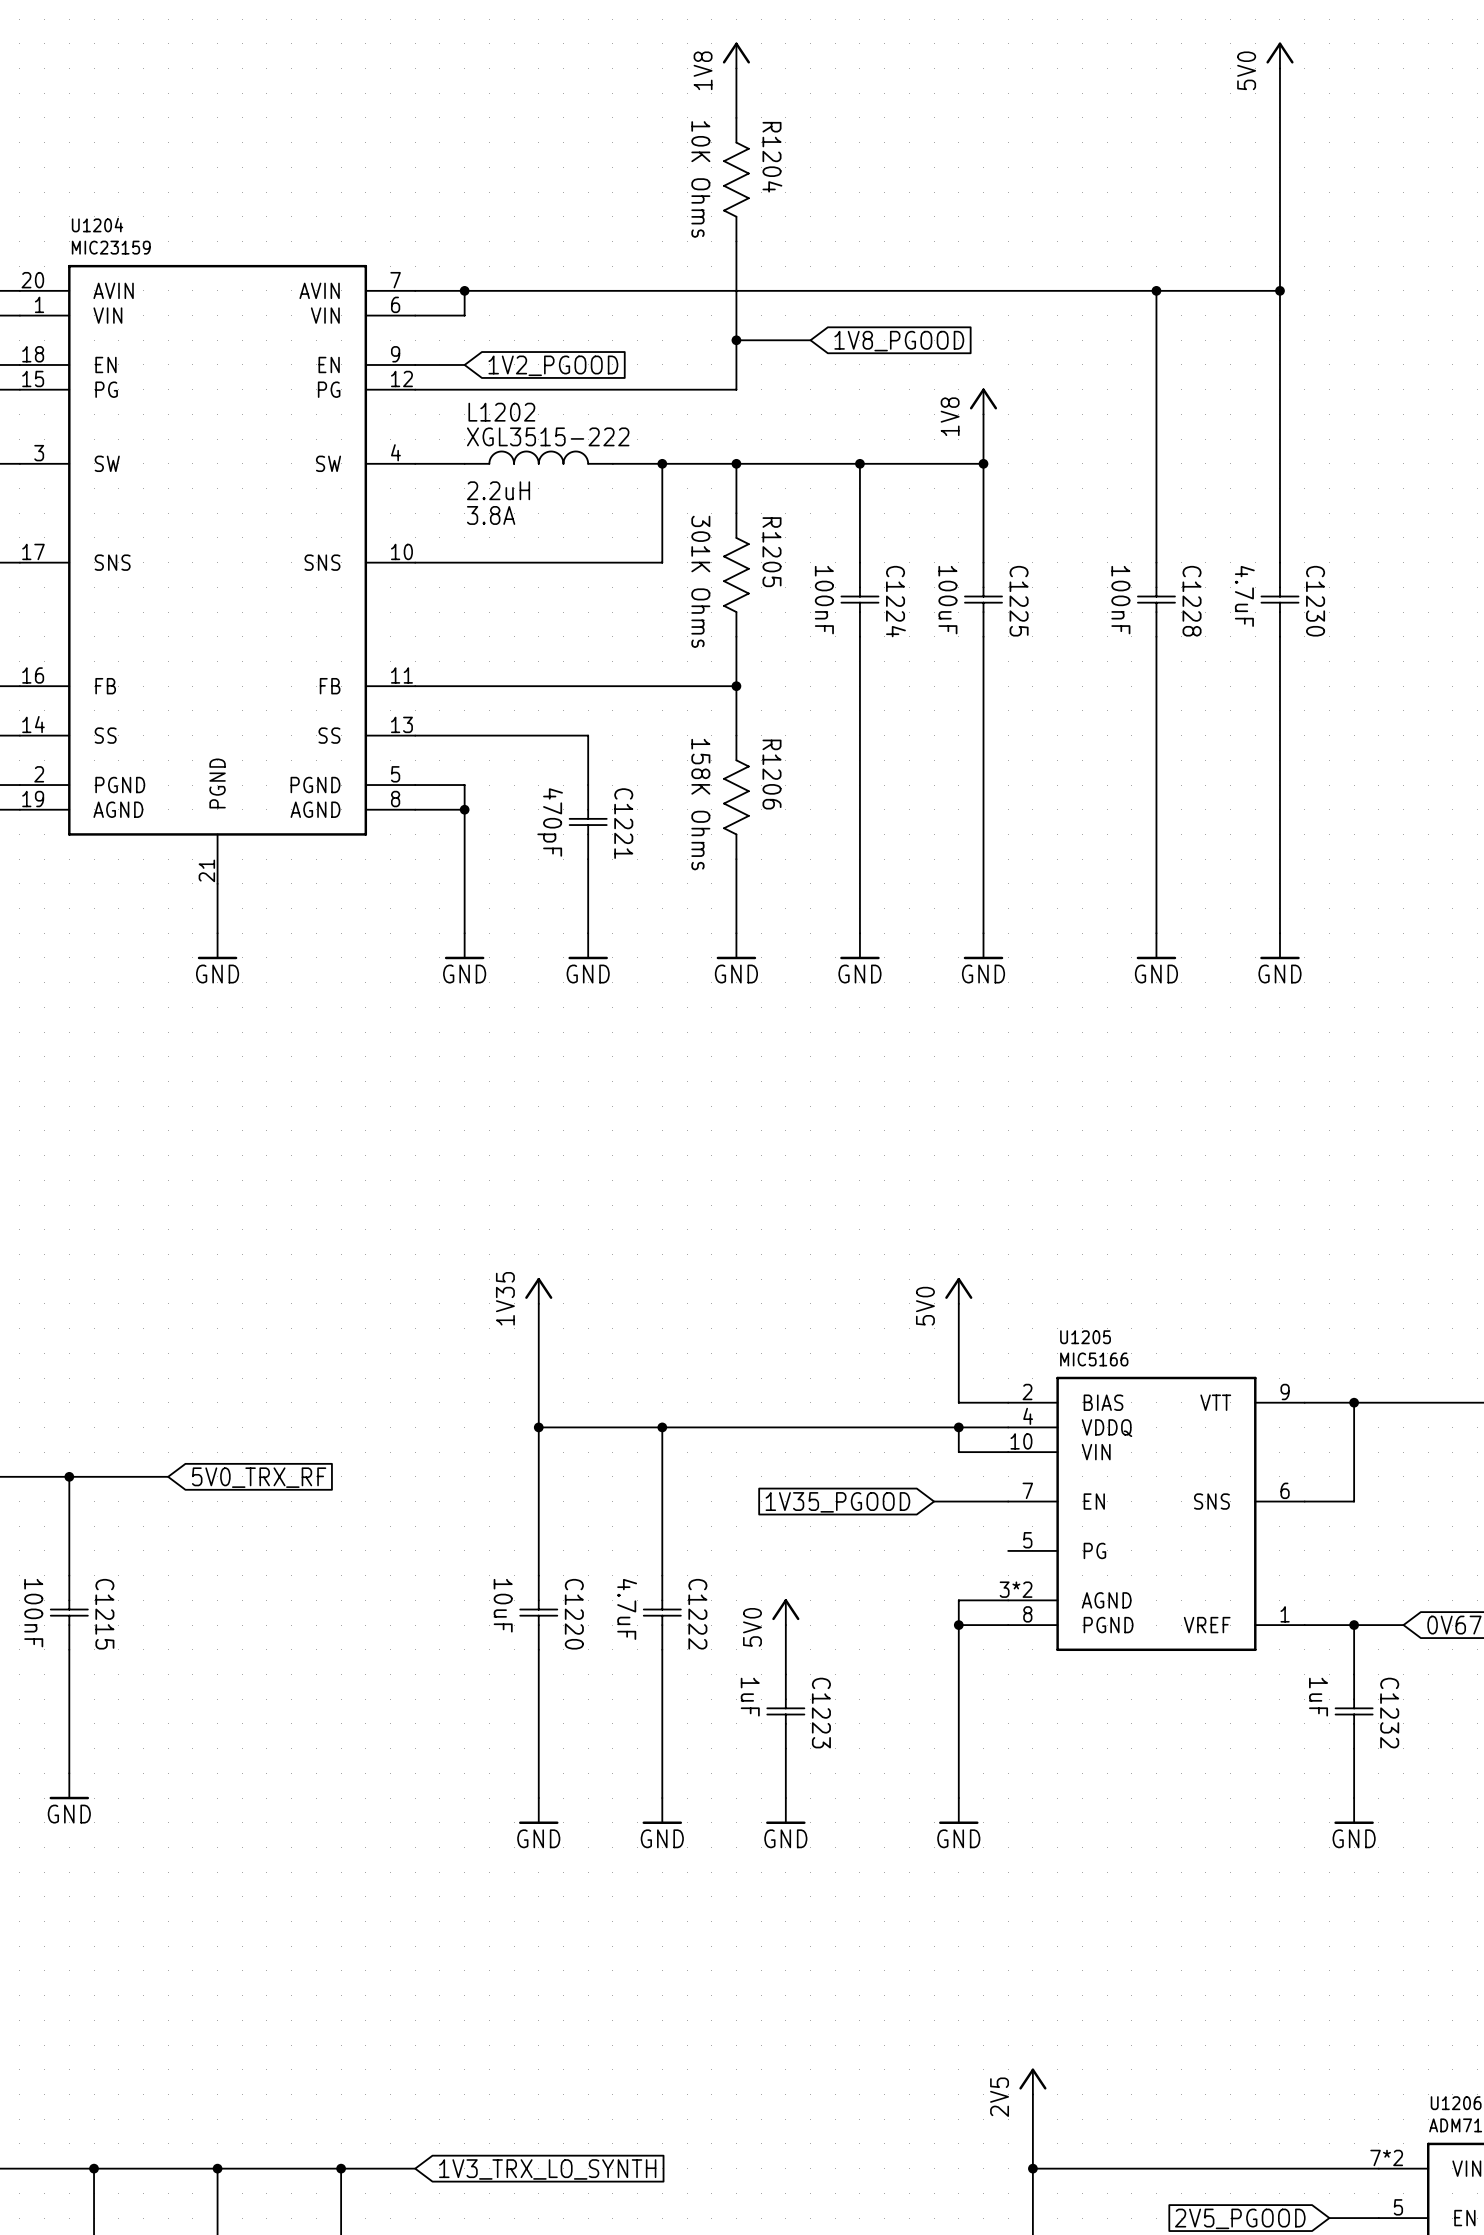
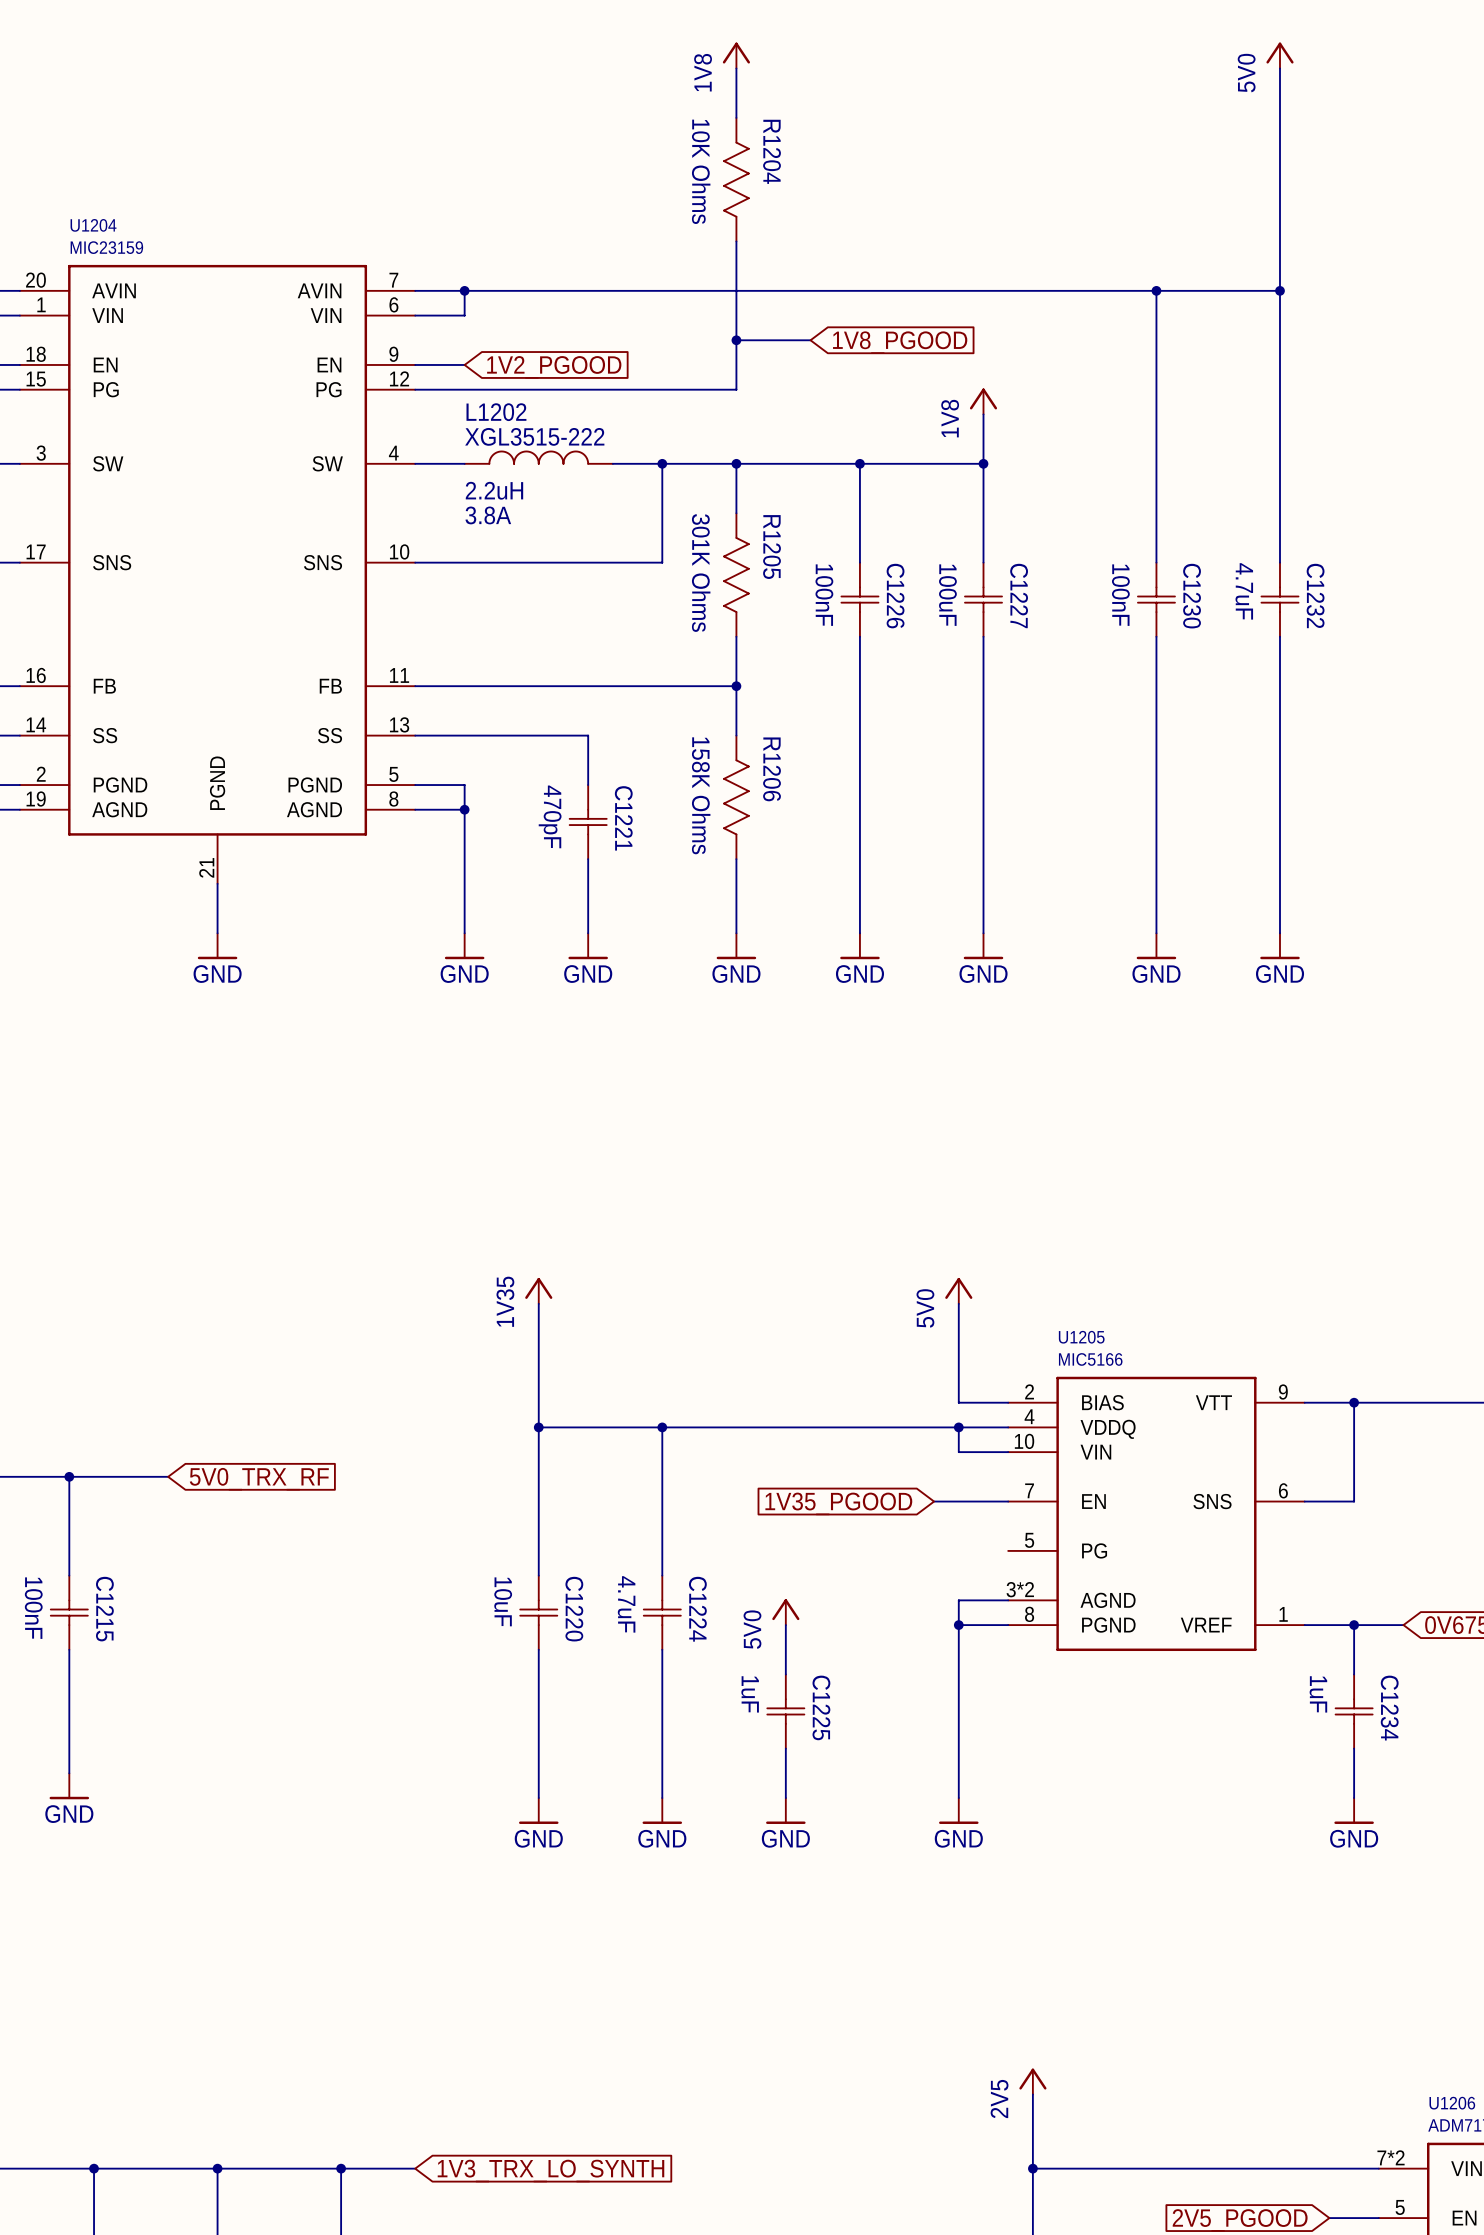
C1224 name: C1224 (895, 601) -> C1226 (895, 596)
C1225 name: C1225 (1019, 601) -> C1227 (1019, 595)
C1228 name: C1228 (1192, 601) -> C1230 (1192, 596)
C1230 name: C1230 (1315, 601) -> C1232 (1315, 595)
C1222 name: C1222 (697, 1614) -> C1224 (697, 1609)
C1223 name: C1223 (821, 1713) -> C1225 (821, 1707)
C1232 name: C1232 (1389, 1713) -> C1234 (1389, 1708)

